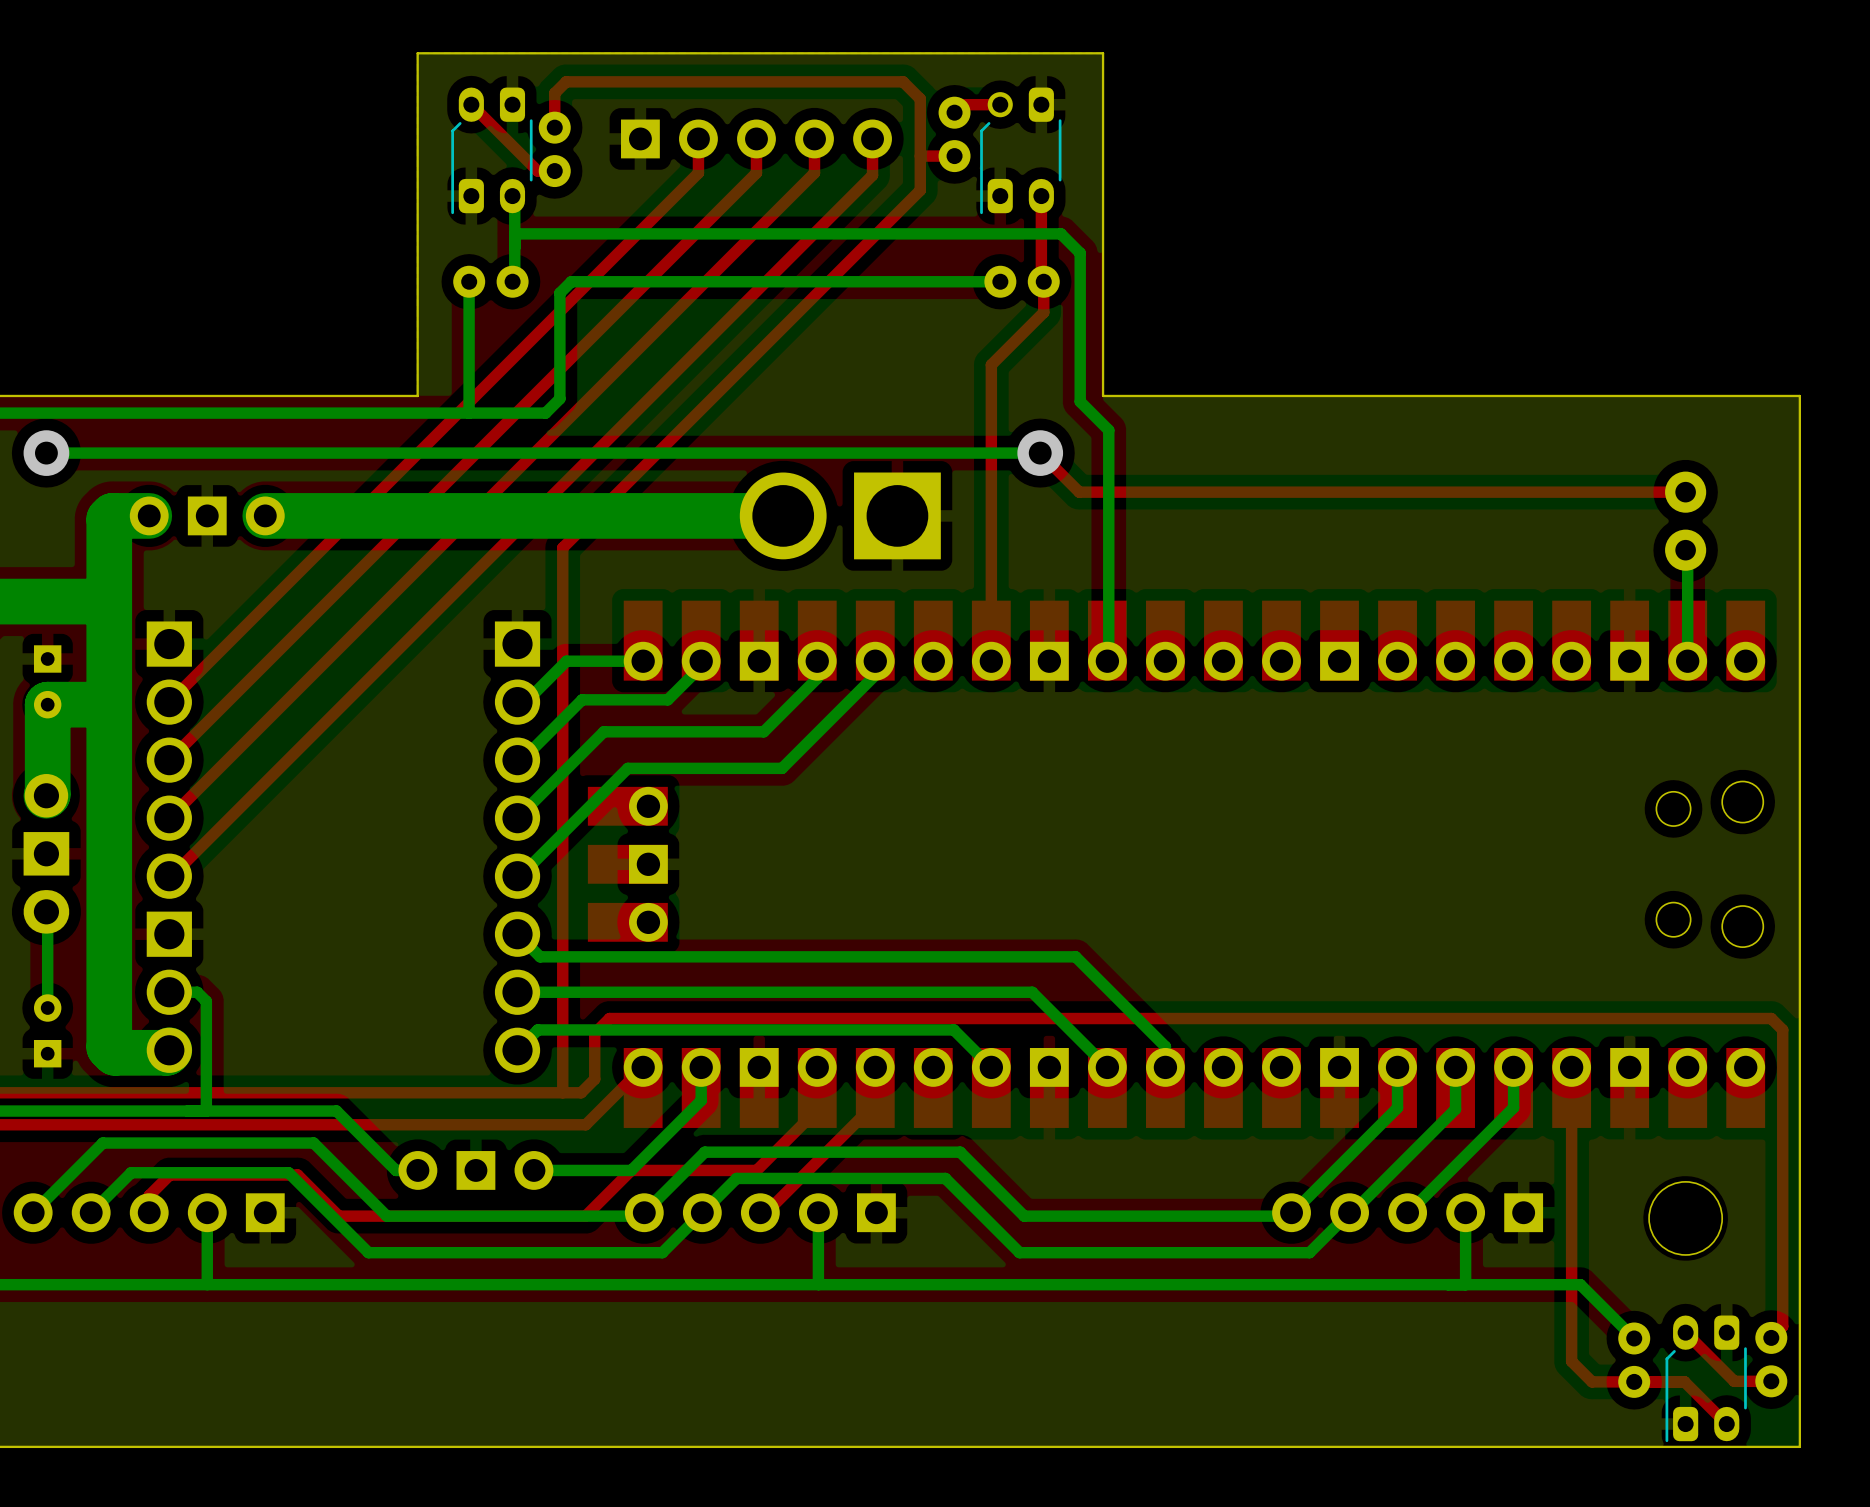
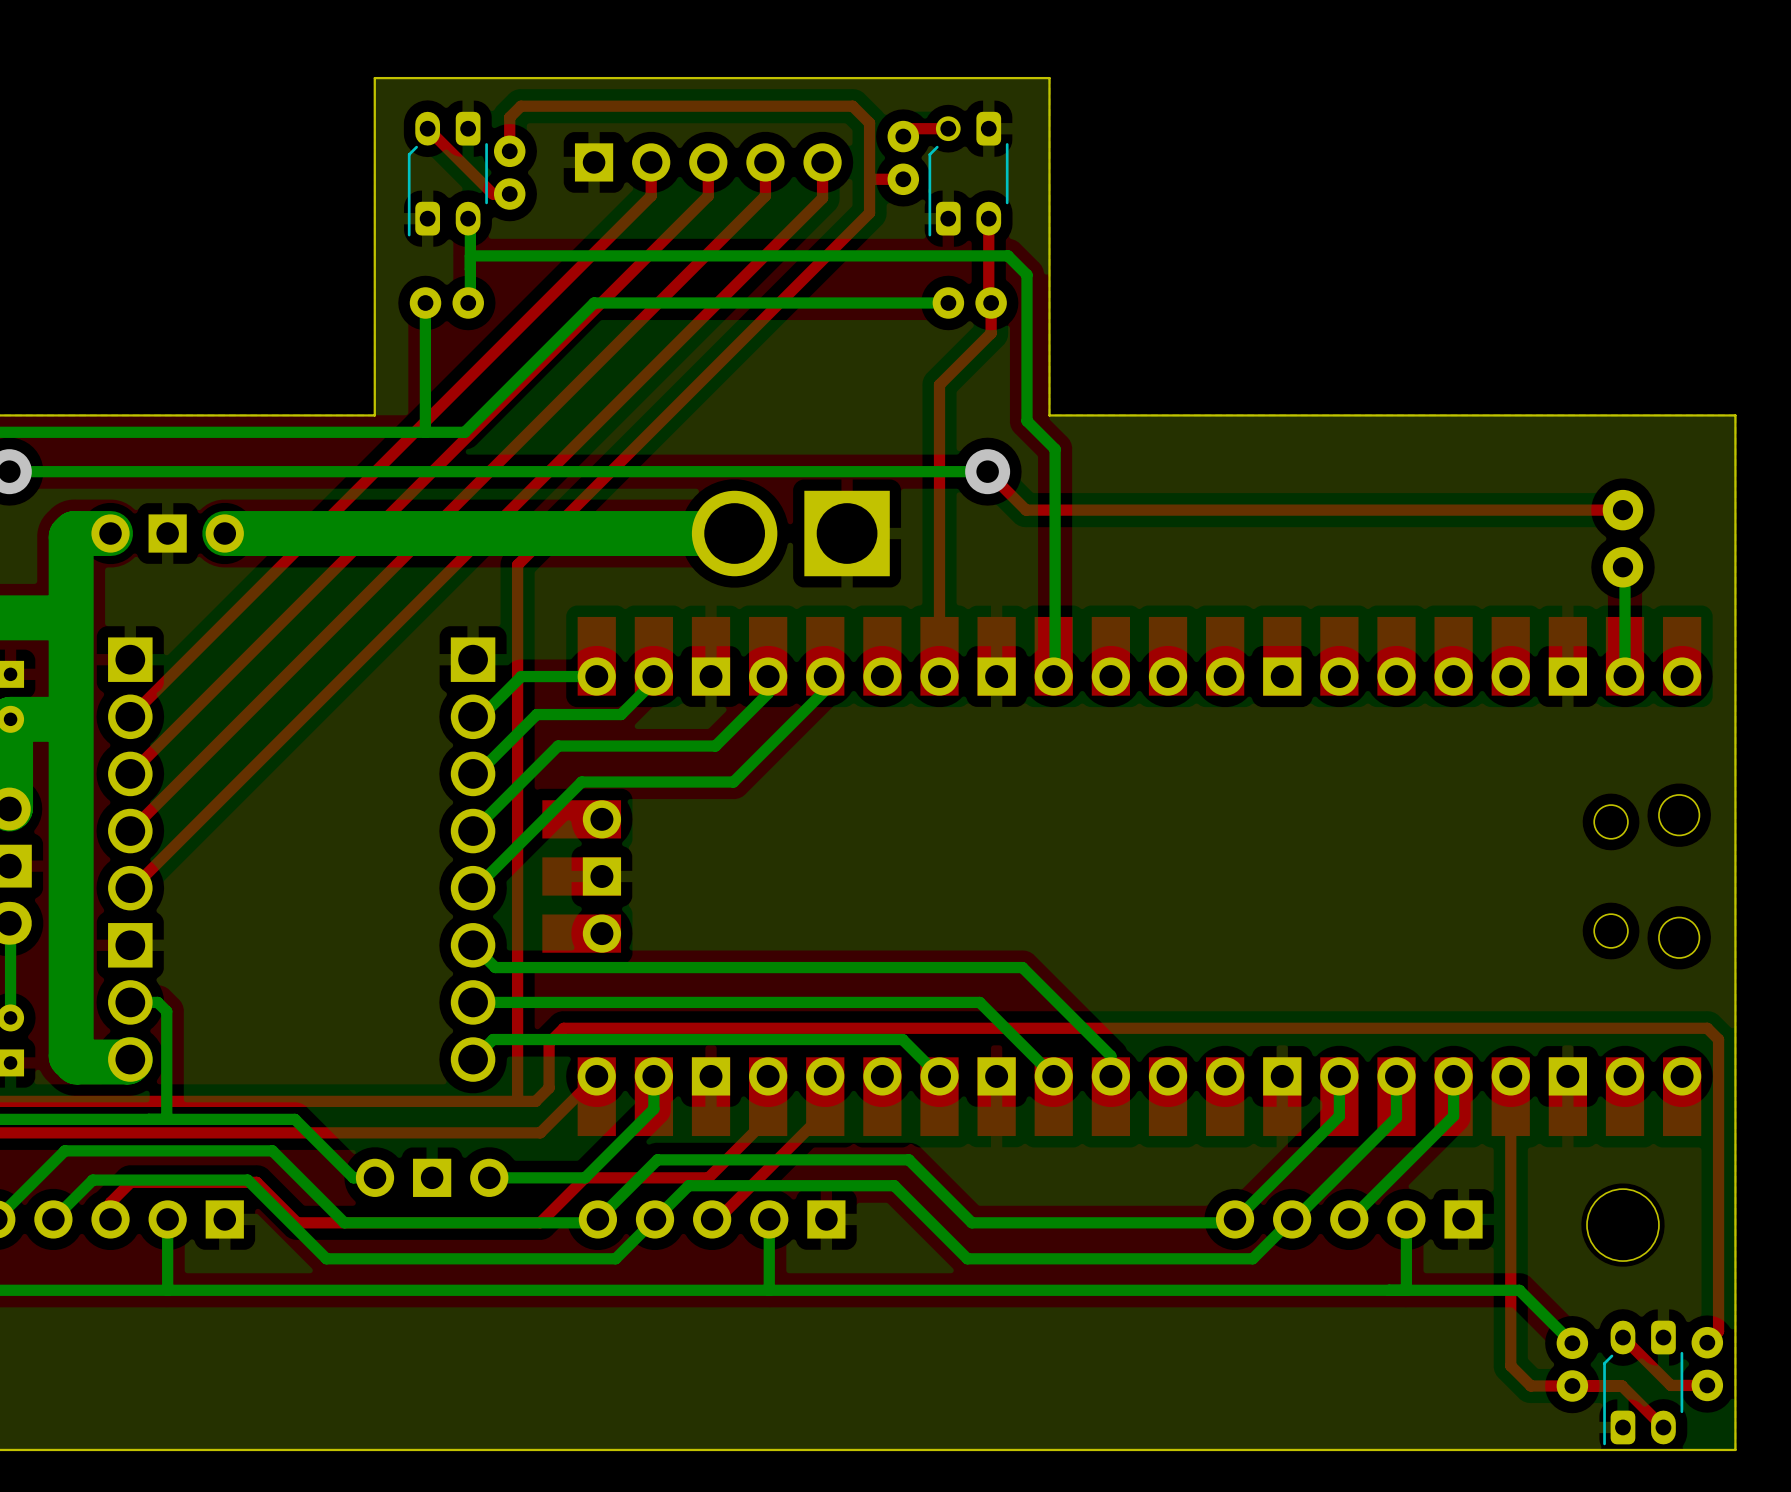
bottom track: (640, 281) (571, 281) (559, 293) (559, 398) (545, 413) (509, 413) -> (594, 302) (464, 432)

